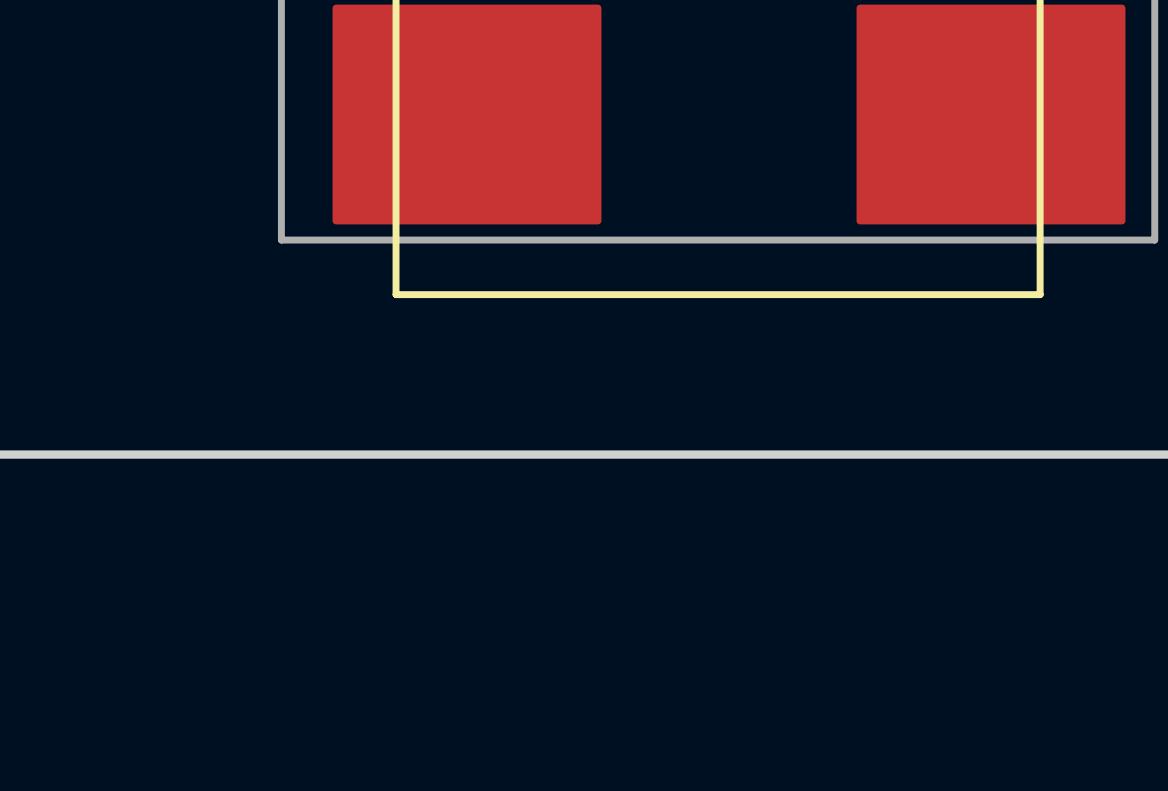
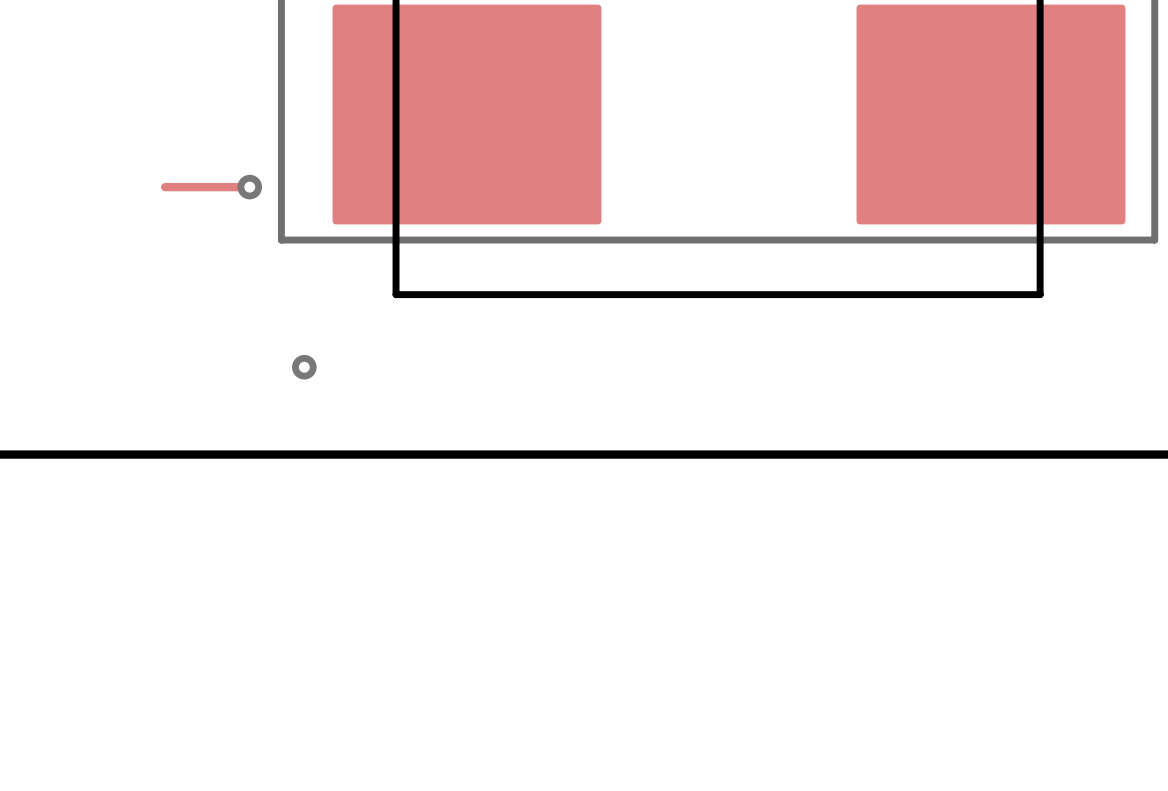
track: none -> (165, 187) (249, 187)
via: none -> (249, 187)
via: none -> (304, 367)

